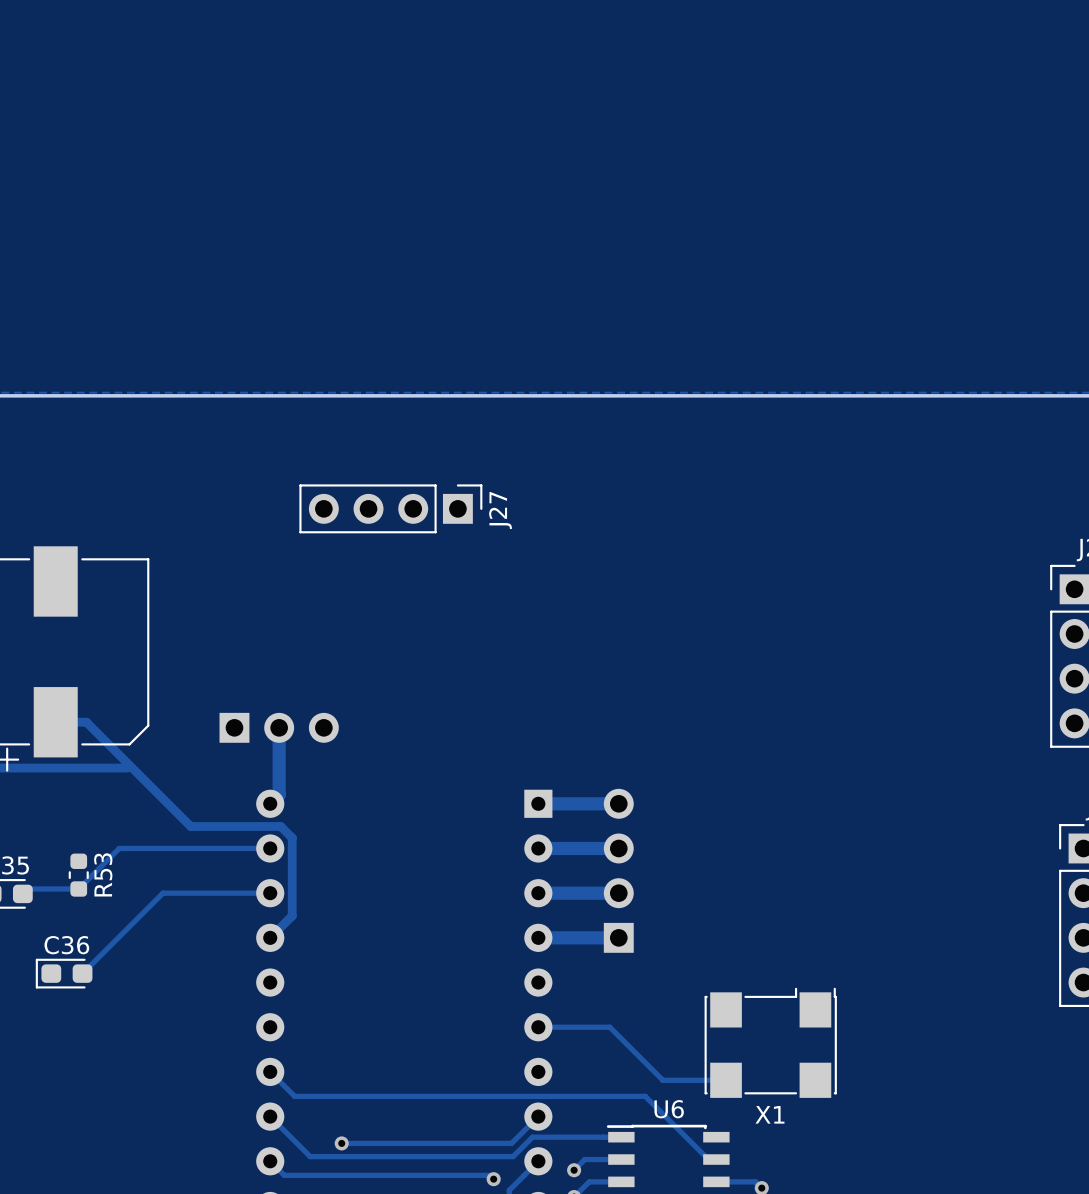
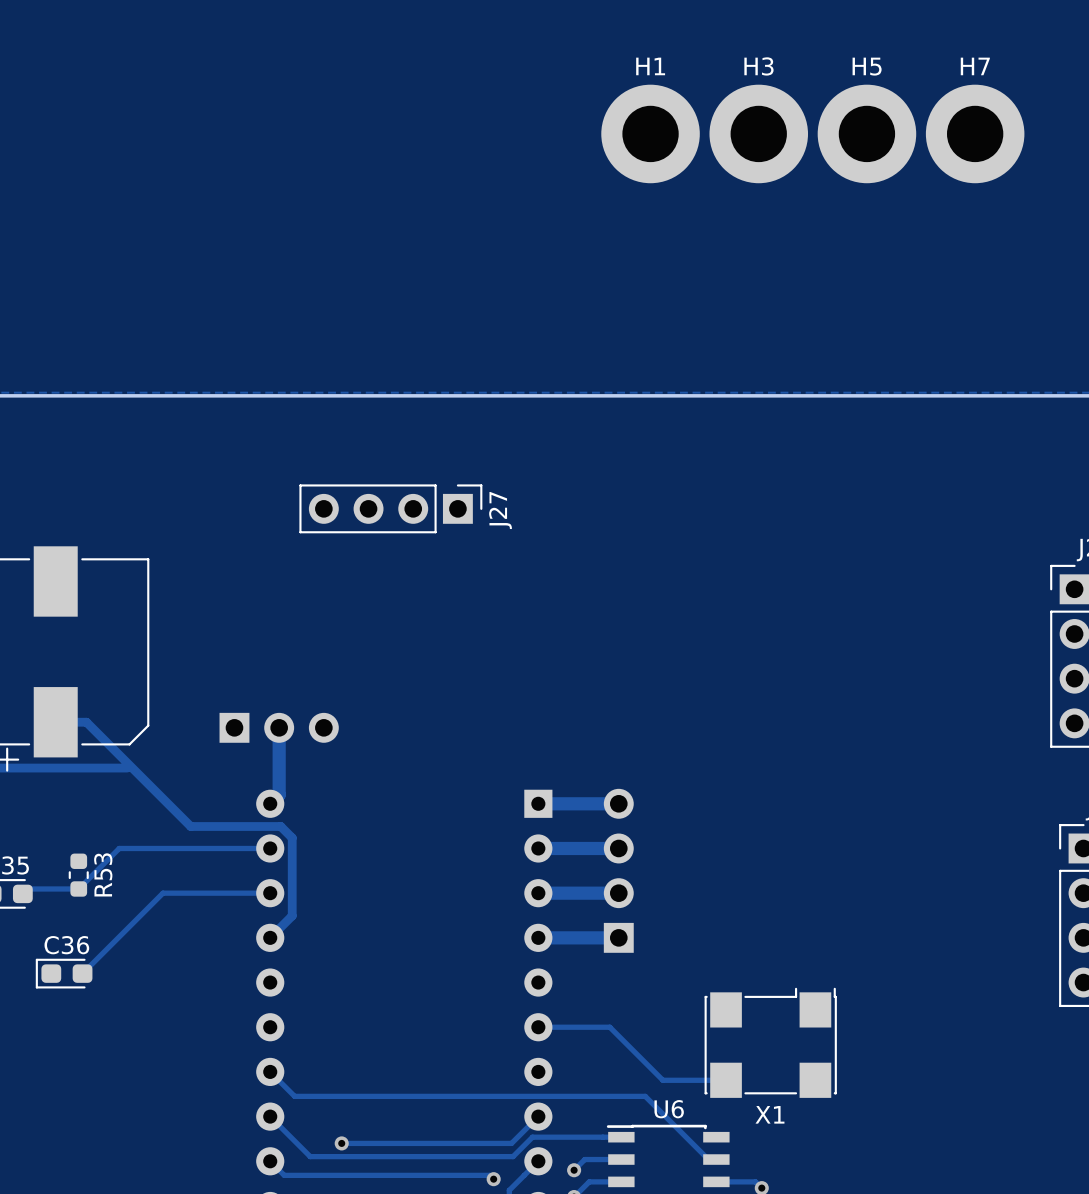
H1: none -> (650, 133)
H3: none -> (758, 133)
H5: none -> (866, 133)
H7: none -> (975, 133)

